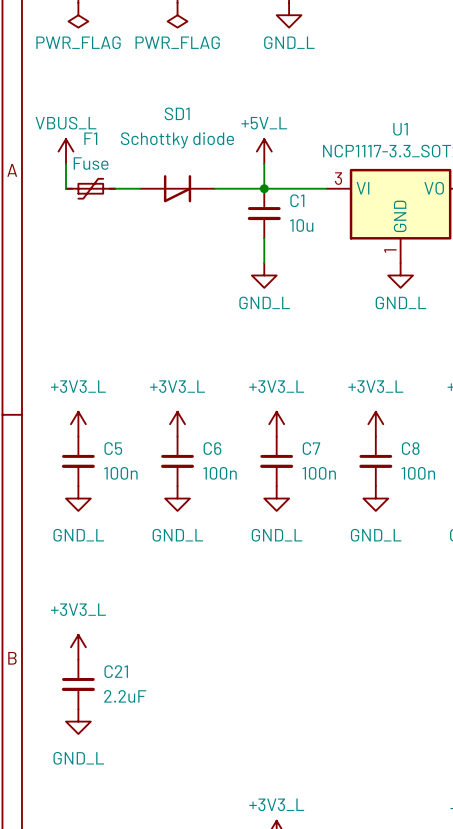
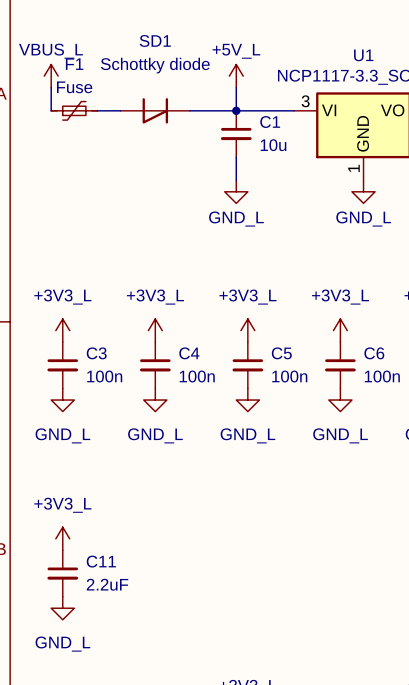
C5 name: C5 (113, 448) -> C3 (96, 353)
C6 name: C6 (212, 448) -> C4 (189, 353)
C7 name: C7 (311, 448) -> C5 (281, 353)
C8 name: C8 (410, 448) -> C6 (374, 353)
C21 name: C21 (116, 671) -> C11 (101, 561)

